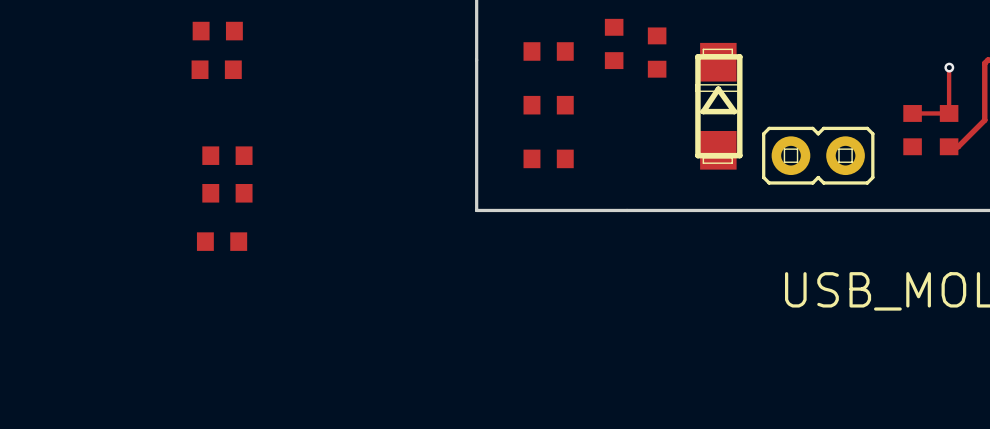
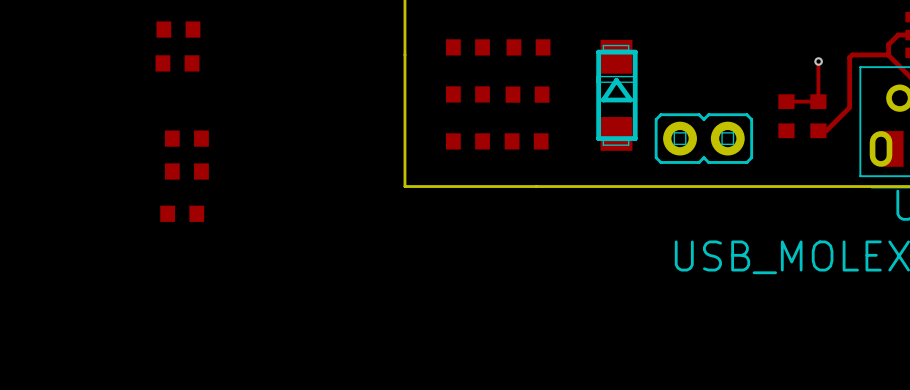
part rotation: 0° (614, 43) -> 90° clockwise (528, 47)
part: (657, 52) -> none
part: none -> (527, 94)
part: none -> (526, 141)

